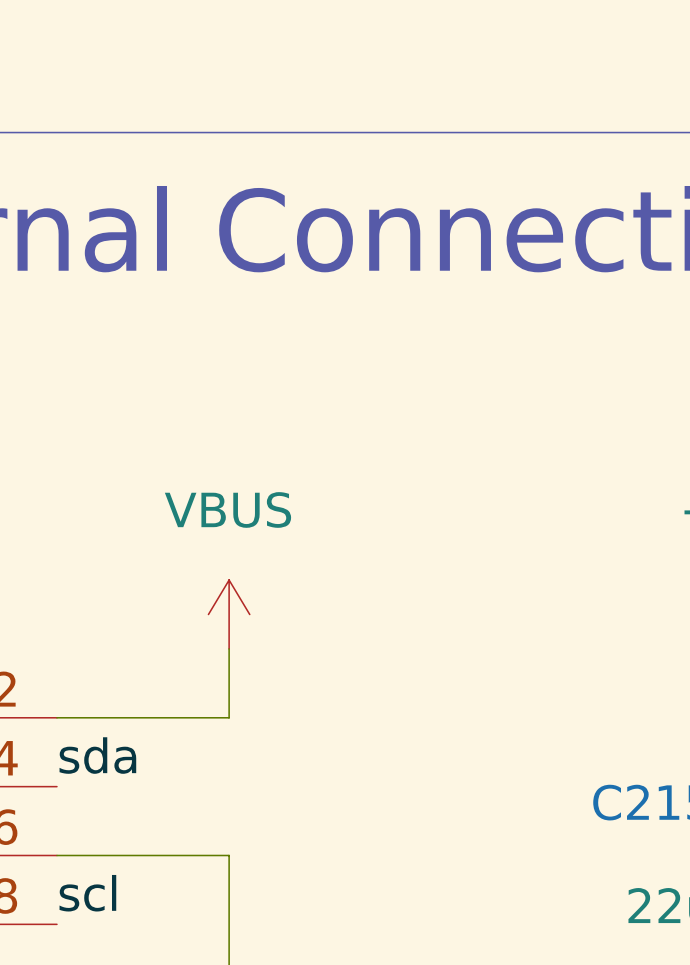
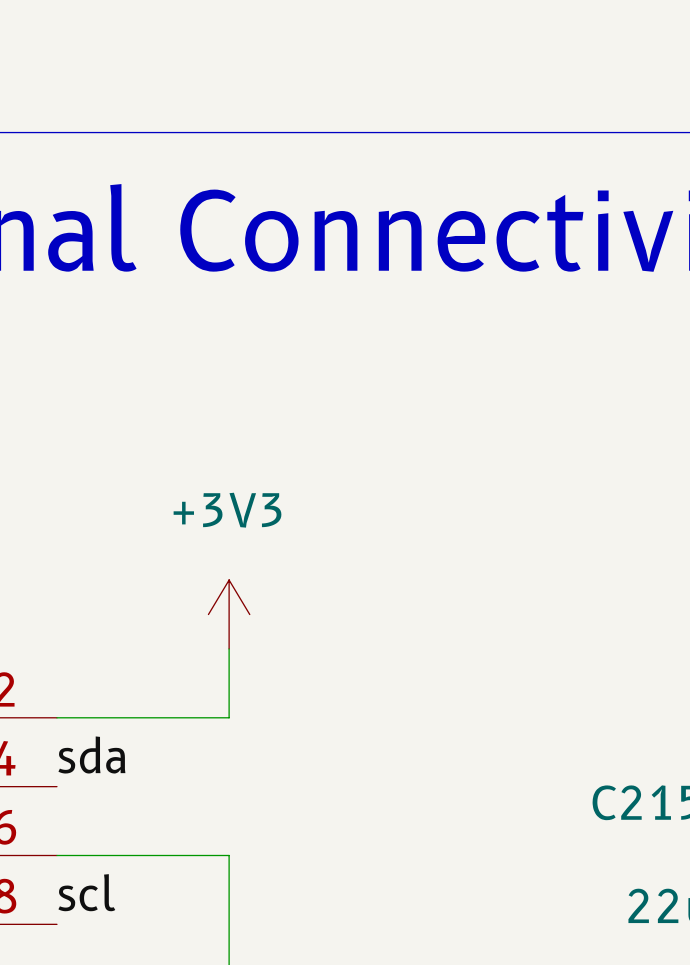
power symbol: VBUS (229, 614) -> +3V3 (229, 614)

